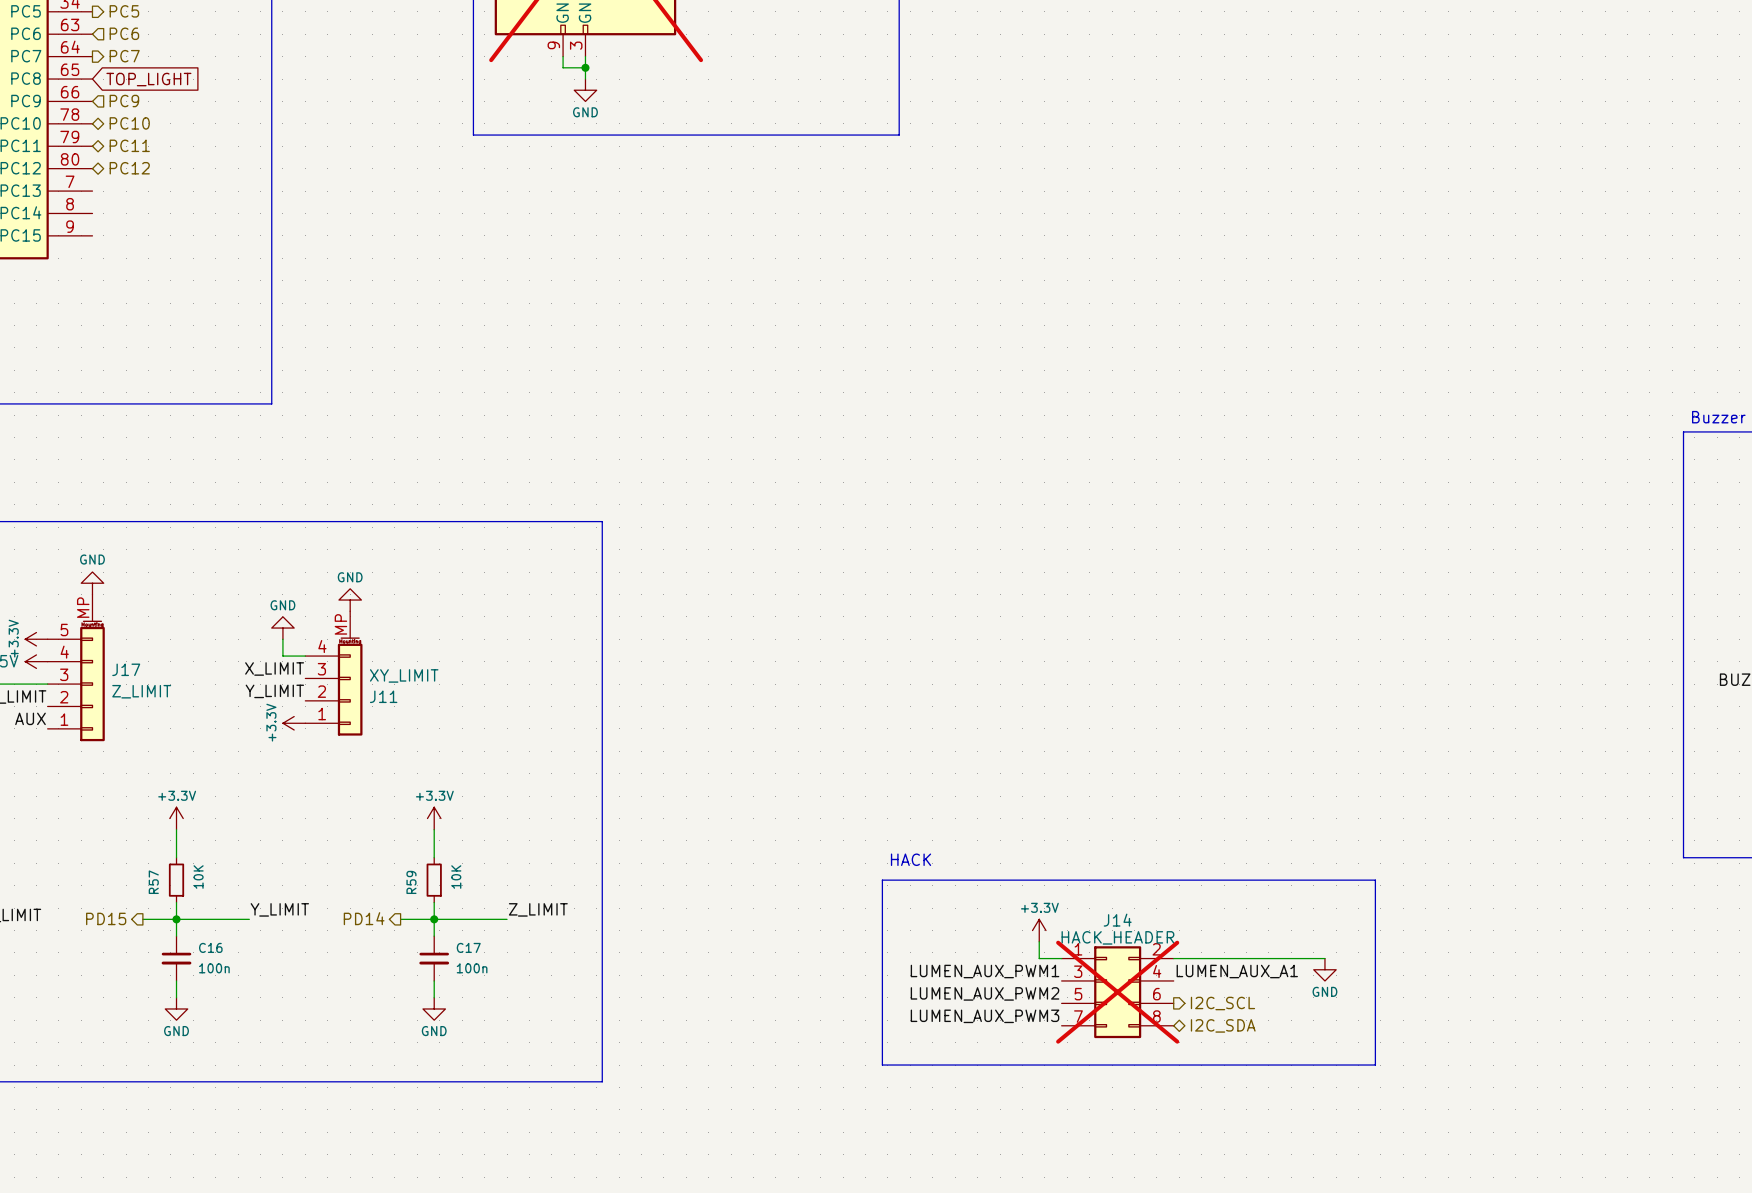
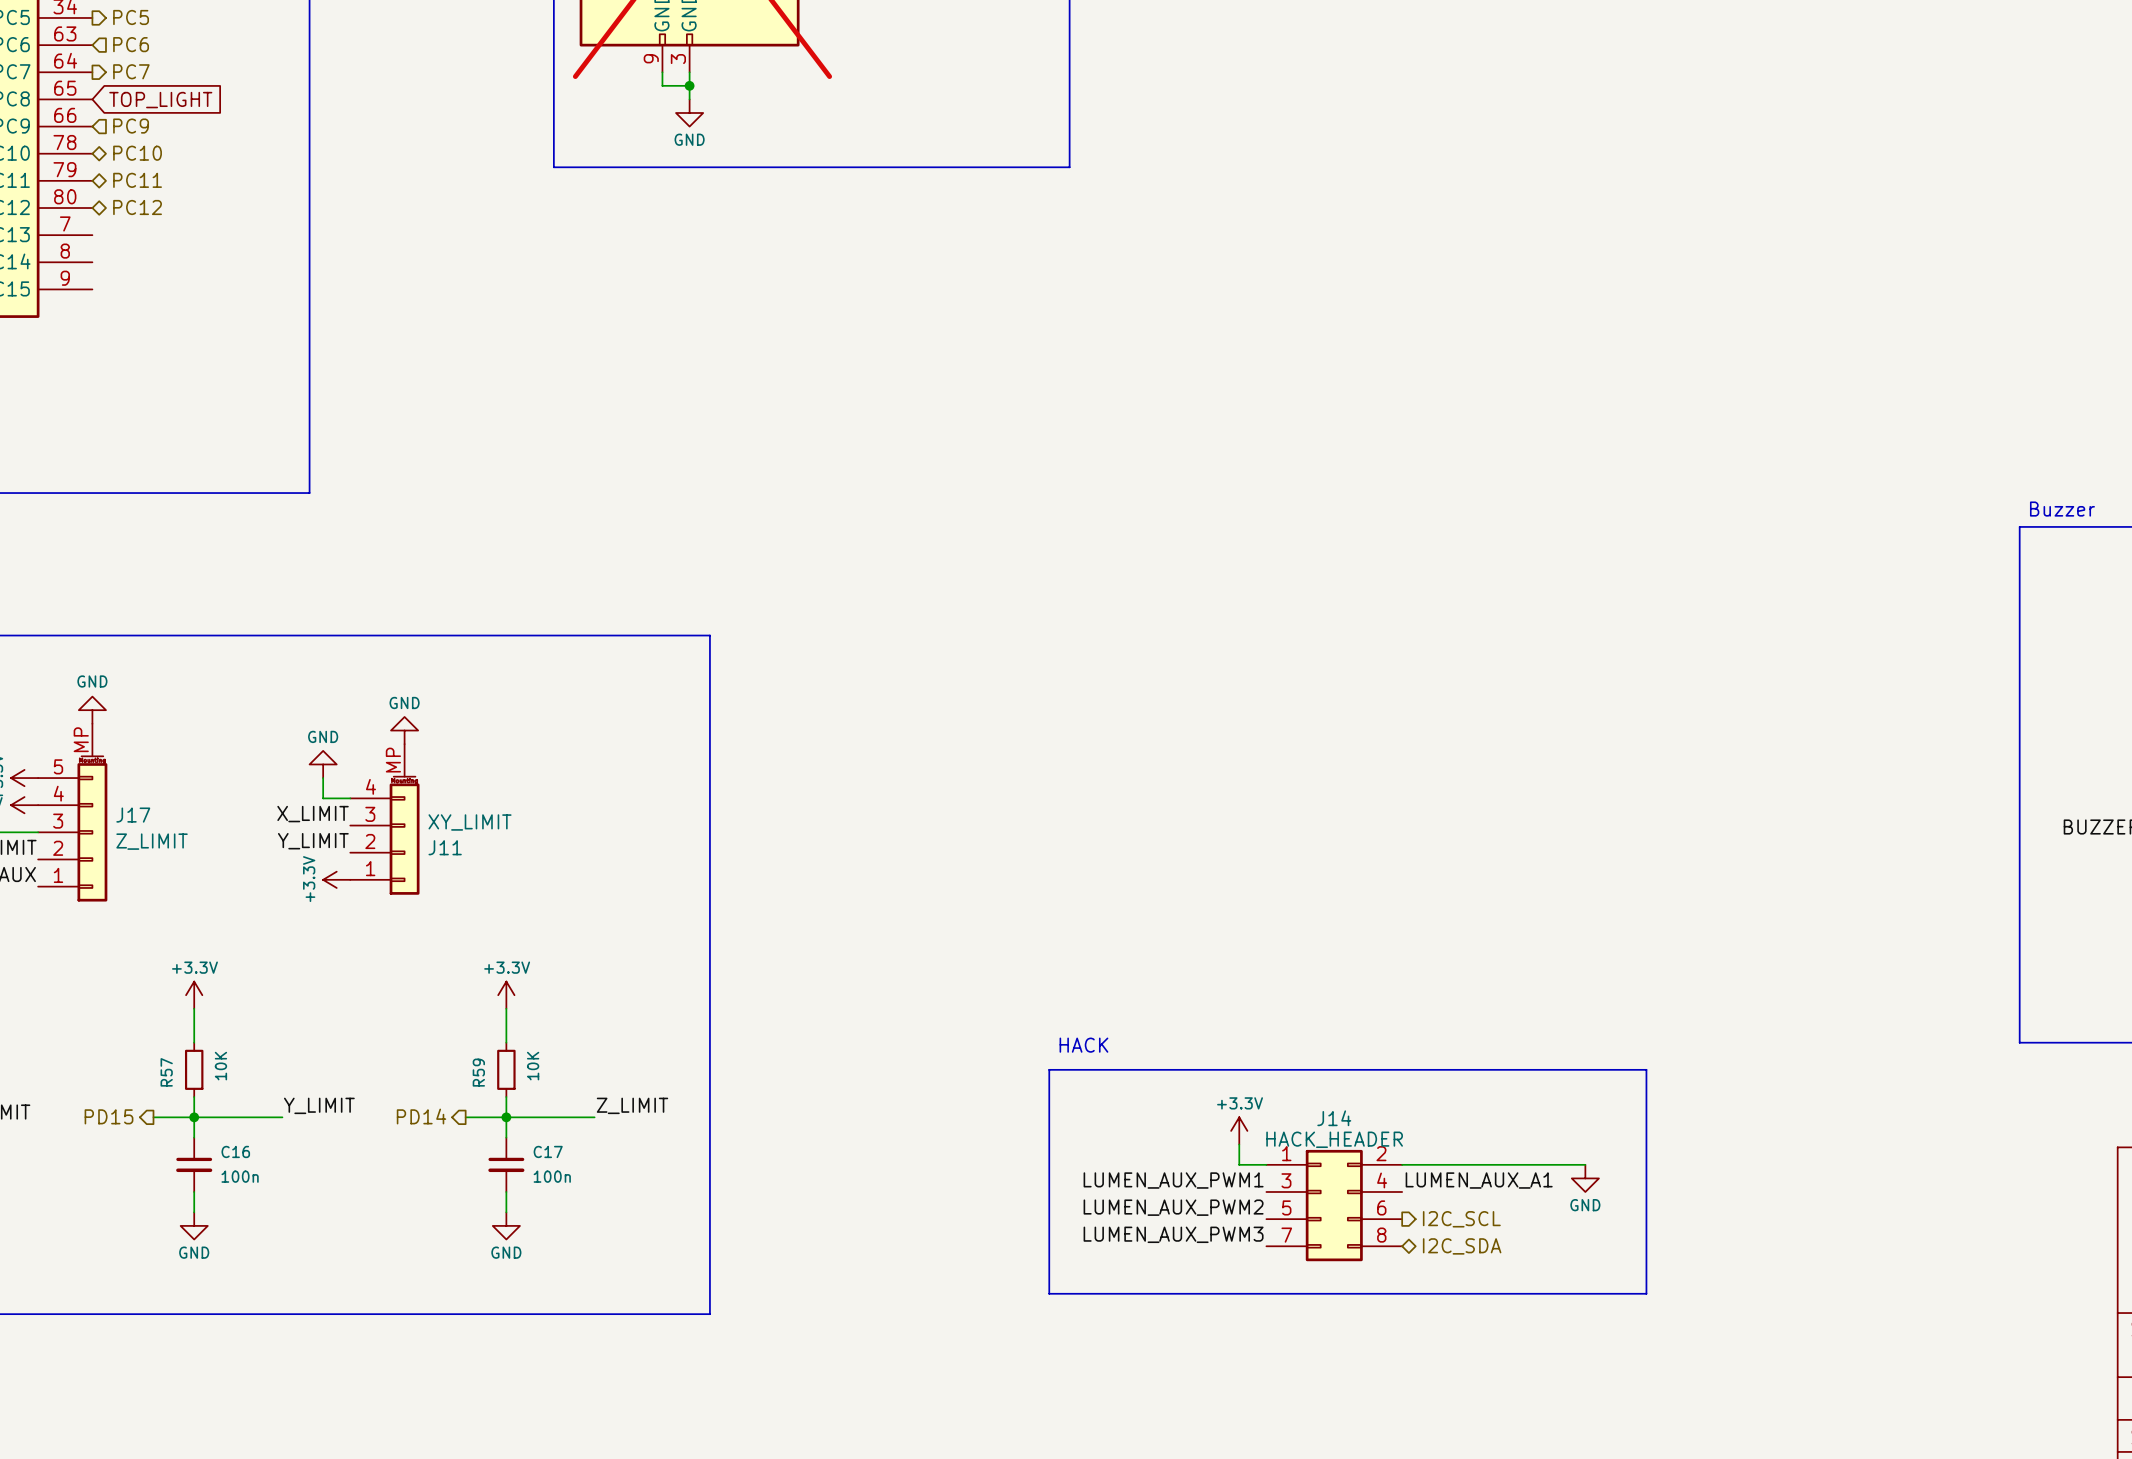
J14 do-not-place cross: (1117, 992) -> none

